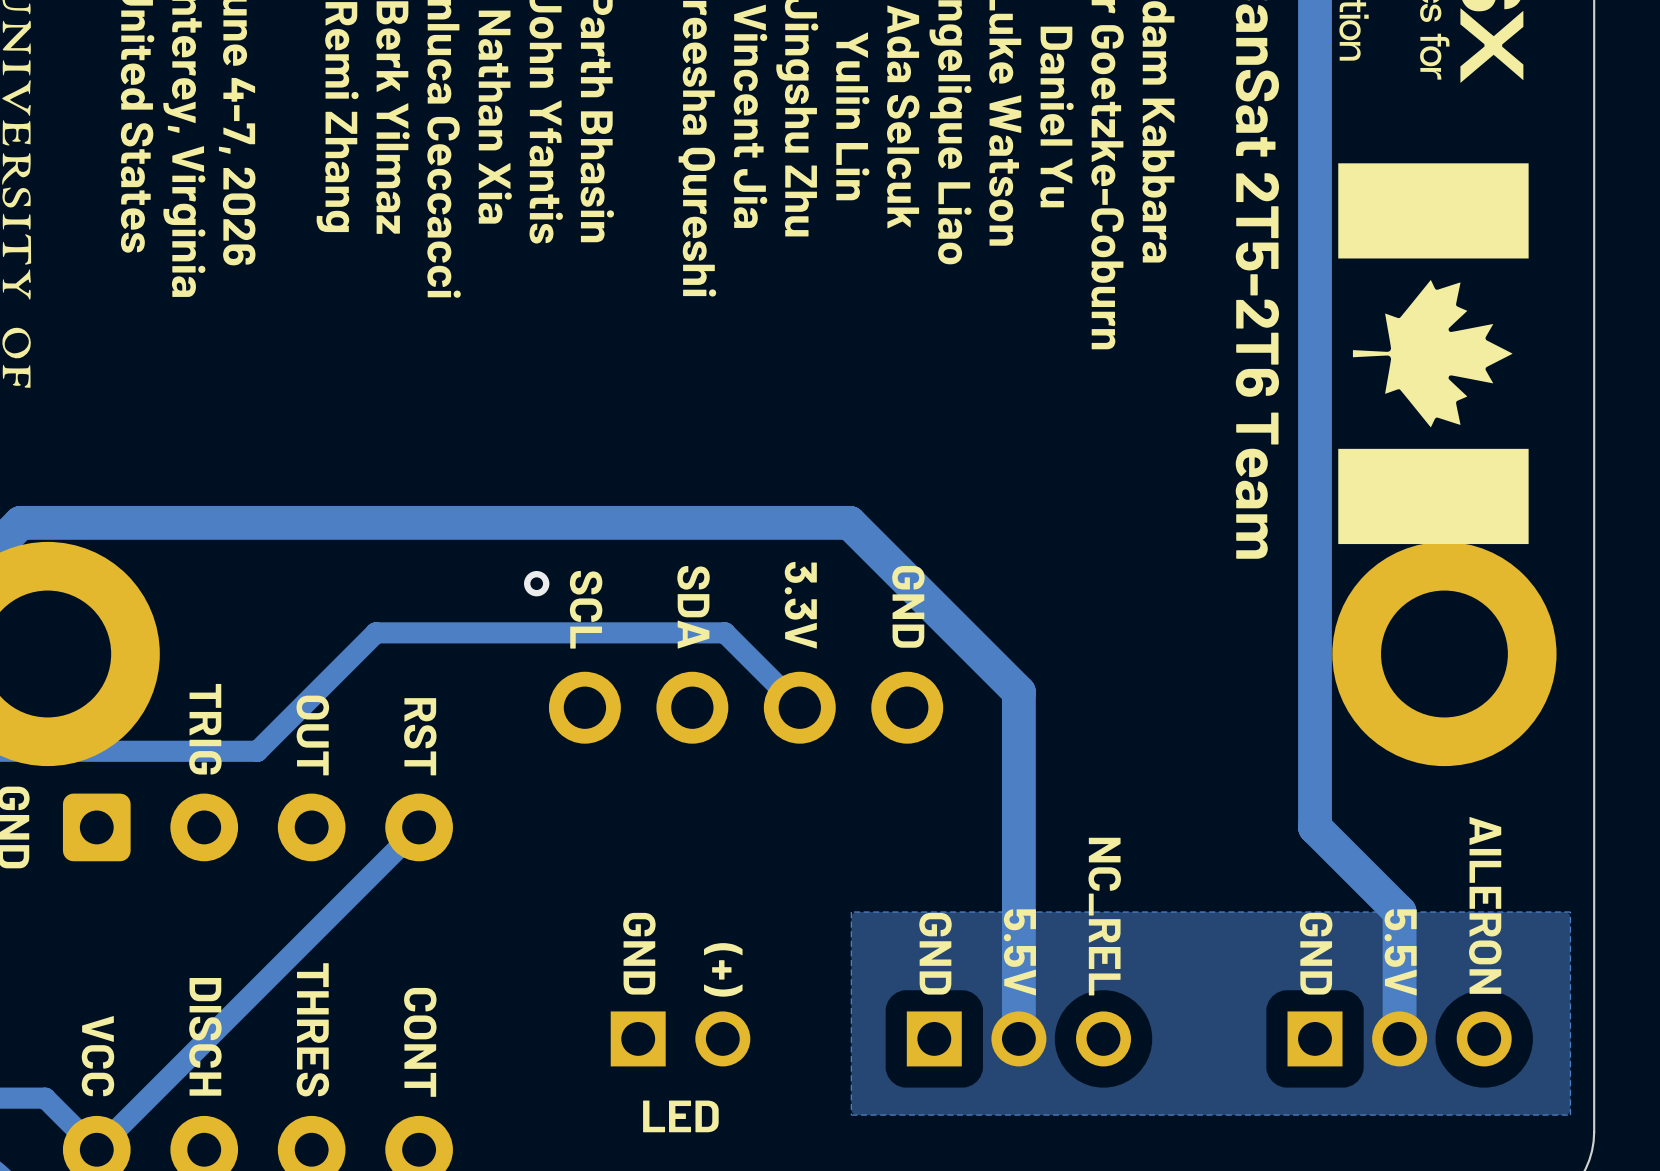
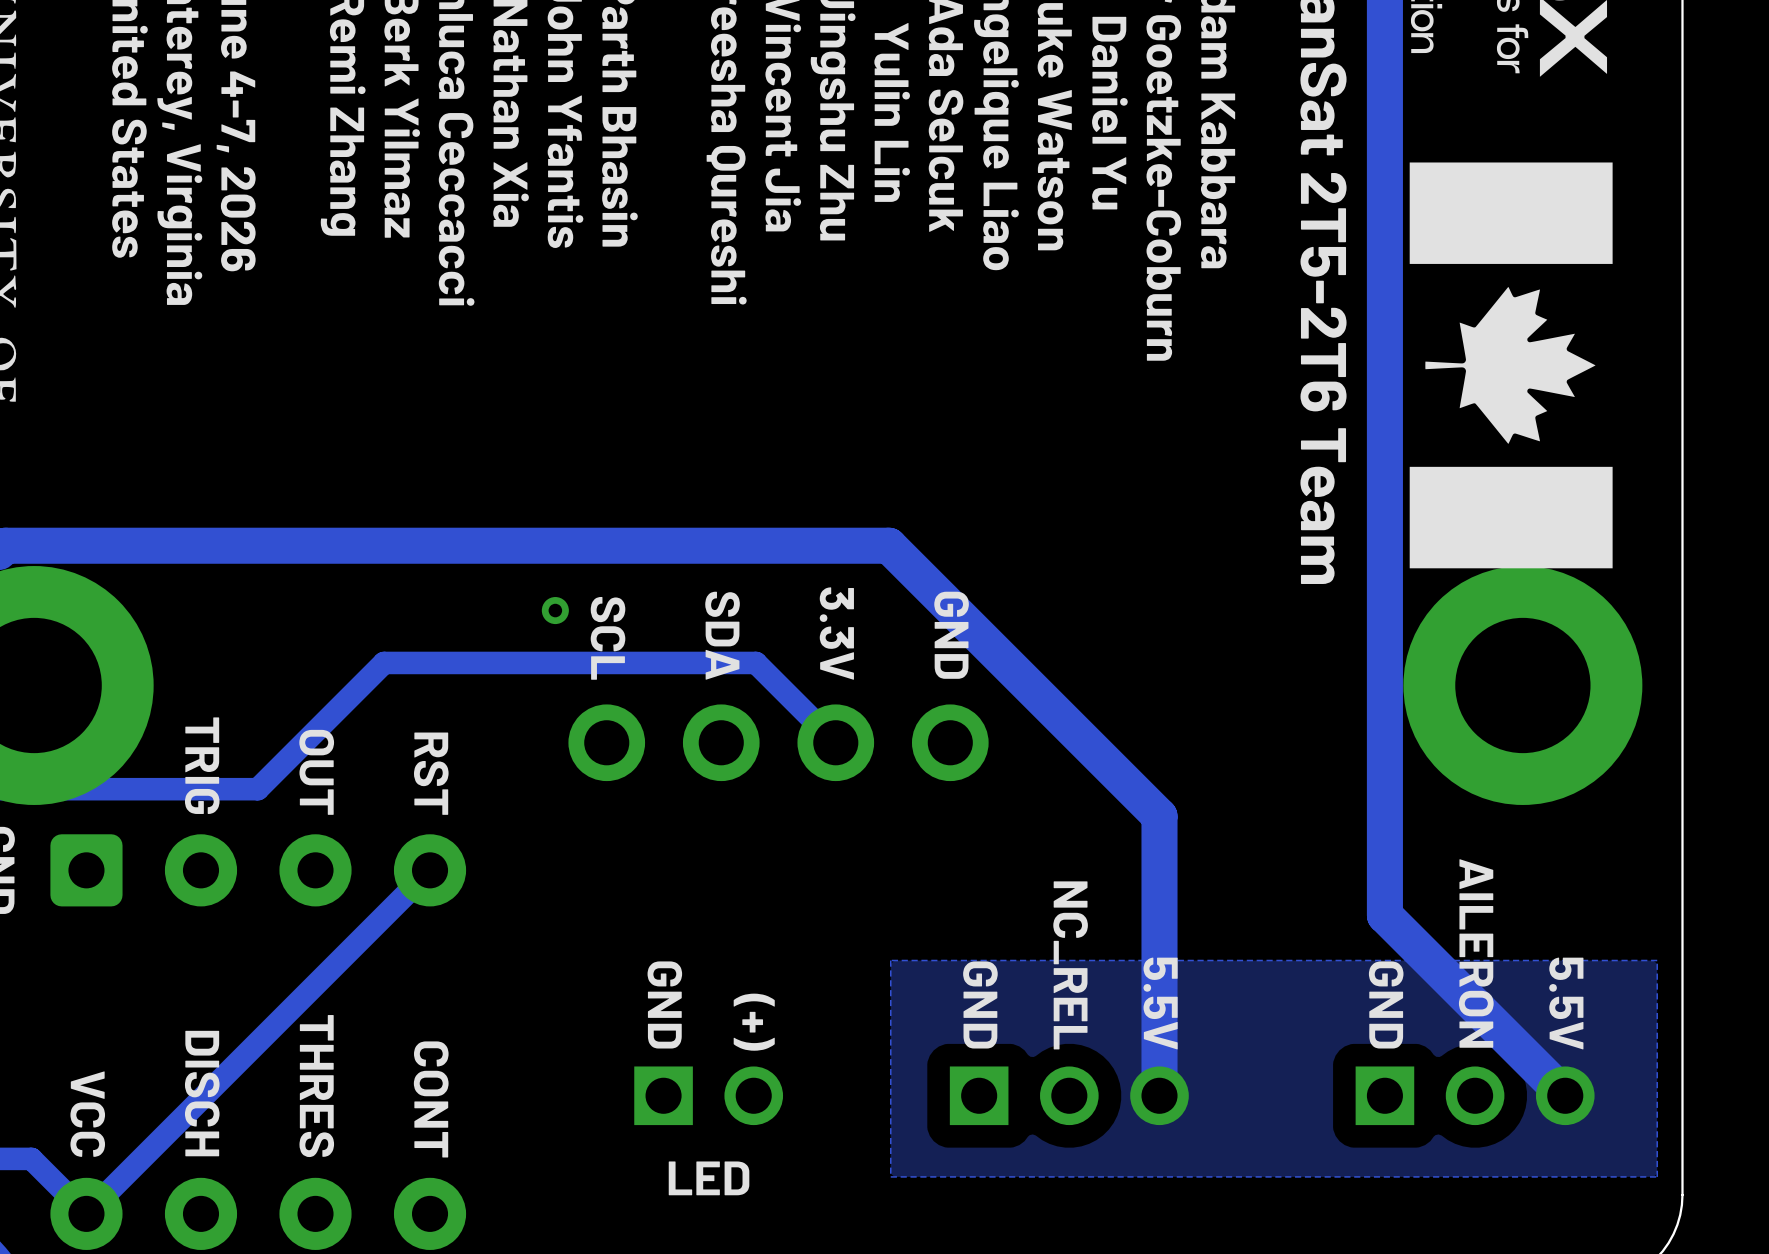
track: (1018, 692) (1018, 1038) -> (1069, 726) (1159, 816) (1159, 1095)
track: (1315, 827) (1399, 912) (1399, 1038) -> (1384, 870) (1384, 915) (1565, 1095)
text: AILERON (1485, 905) -> 5.5V (1566, 1003)
text: NC_REL (1104, 916) -> 5.5V (1160, 1003)
text: 5.5V (1019, 952) -> NC_REL (1070, 965)
text: 5.5V (1400, 952) -> AILERON (1476, 953)

